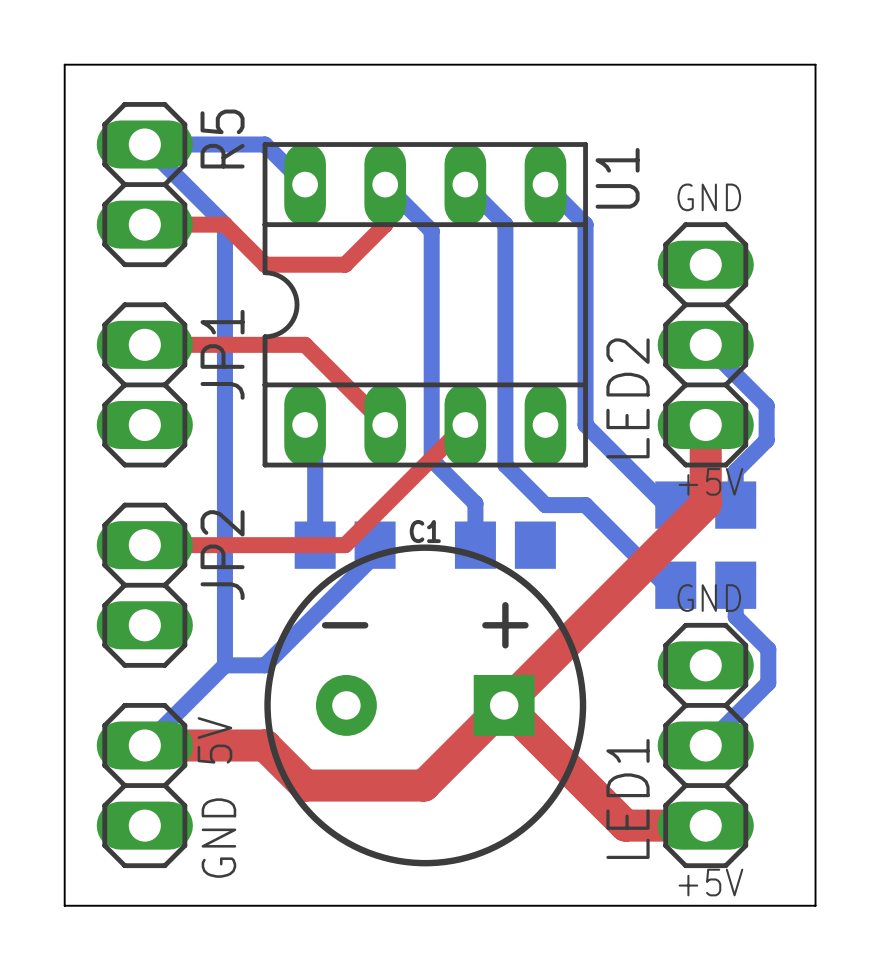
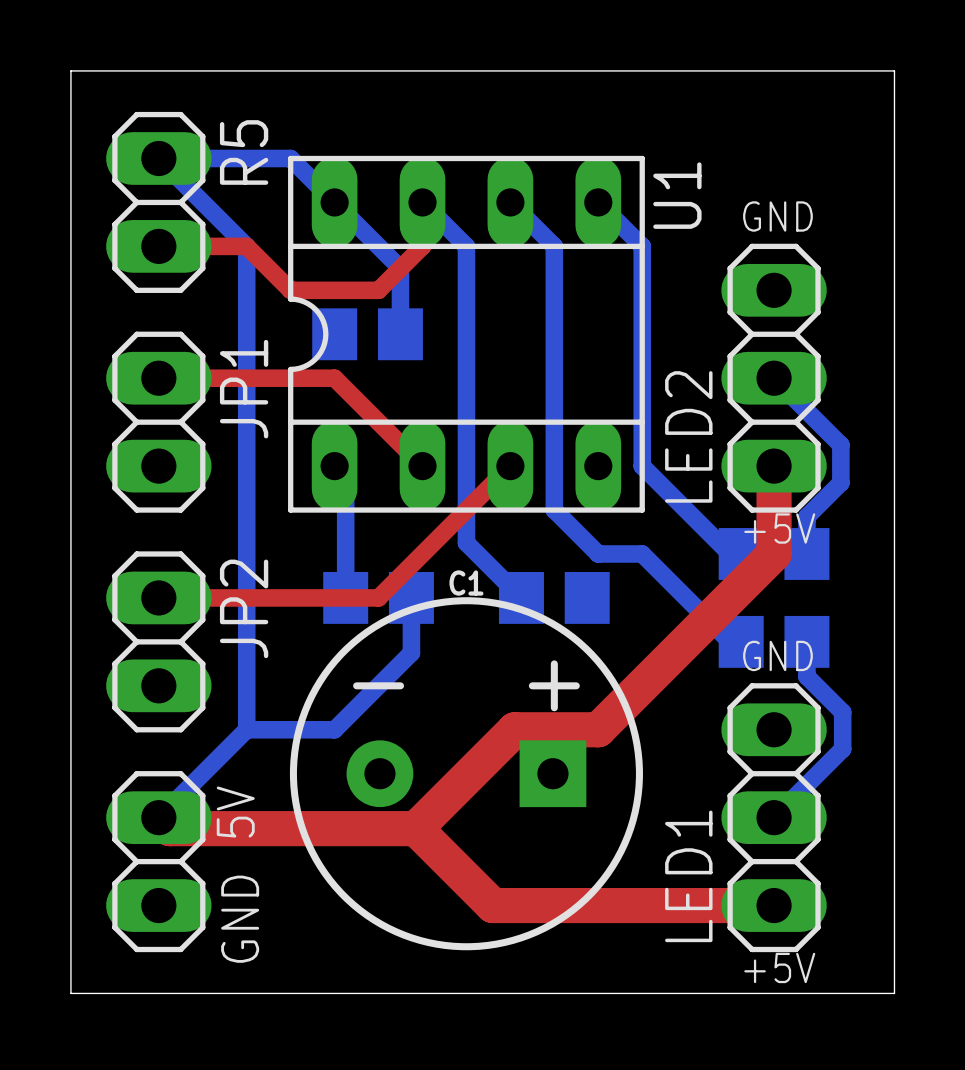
bottom track: none -> (334, 202) (400, 268) (400, 334)
bottom track: (425, 224) (431, 231) (431, 459) (475, 503) (475, 545) -> (466, 246) (466, 542) (521, 597)
part: none -> (367, 334)
top track: (705, 503) (424, 785) (305, 785) (265, 745) (144, 745) -> (774, 552) (598, 729) (514, 729) (415, 828)
bottom track: (385, 545) (265, 665) -> (411, 597) (411, 652) (334, 729) (290, 729)
top track: (504, 705) (625, 825) -> (415, 828) (492, 905) (686, 905)
top track: none -> (158, 817) (169, 828) (415, 828)

